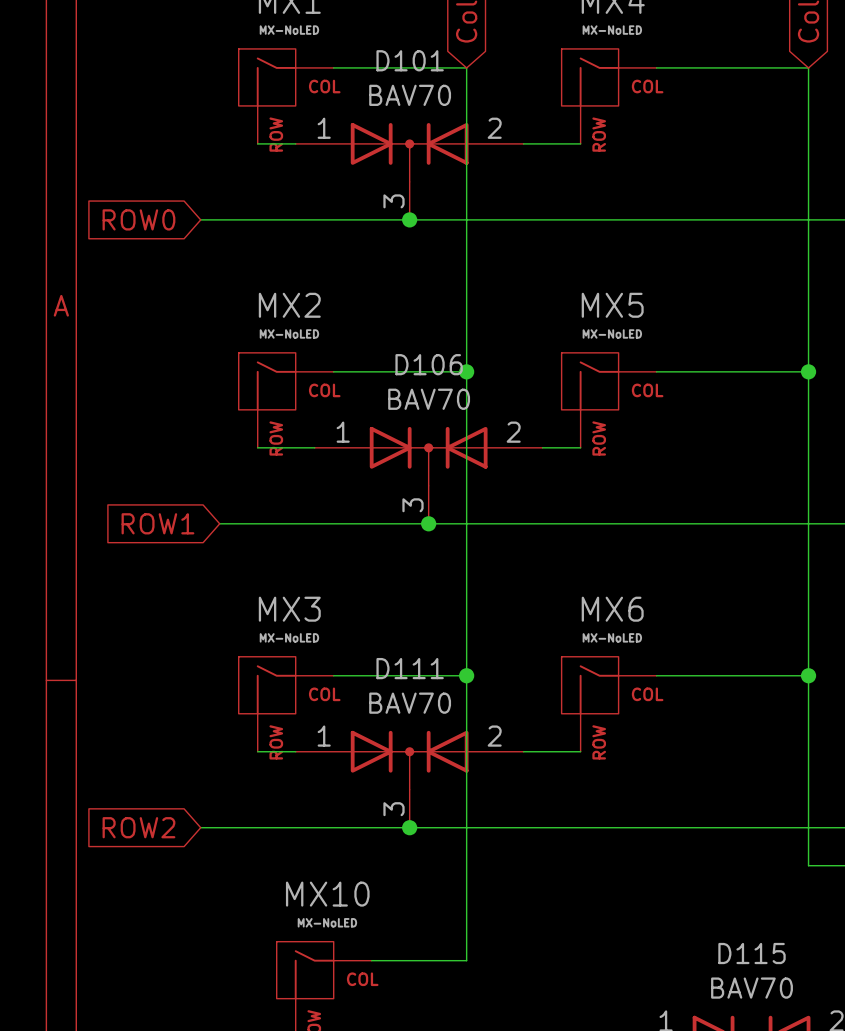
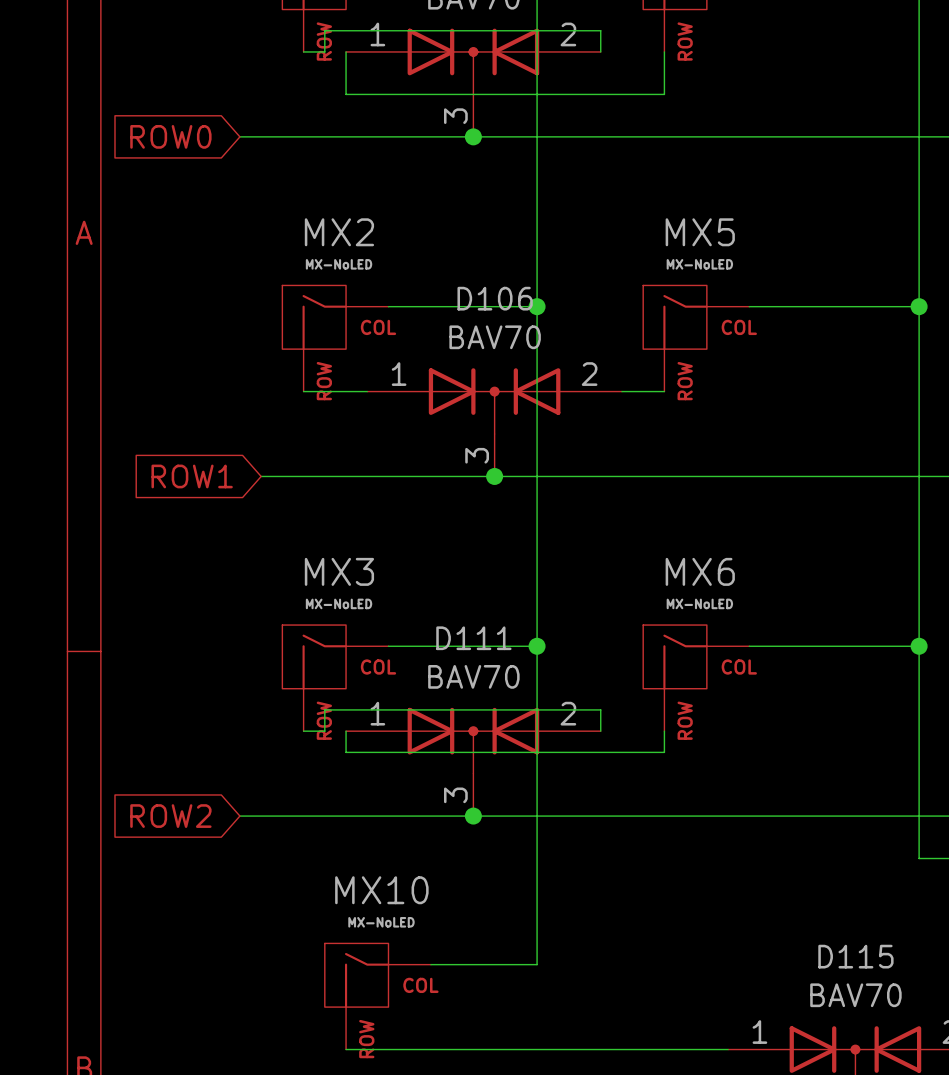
wire: (276, 143) (295, 143) -> (324, 51) (324, 30) (600, 30) (600, 51)
wire: (523, 143) (580, 143) -> (346, 51) (346, 94) (664, 94) (664, 51)
wire: (276, 751) (295, 751) -> (324, 731) (324, 709) (600, 709) (600, 731)
wire: (523, 751) (580, 751) -> (346, 731) (346, 752) (664, 752) (664, 731)

